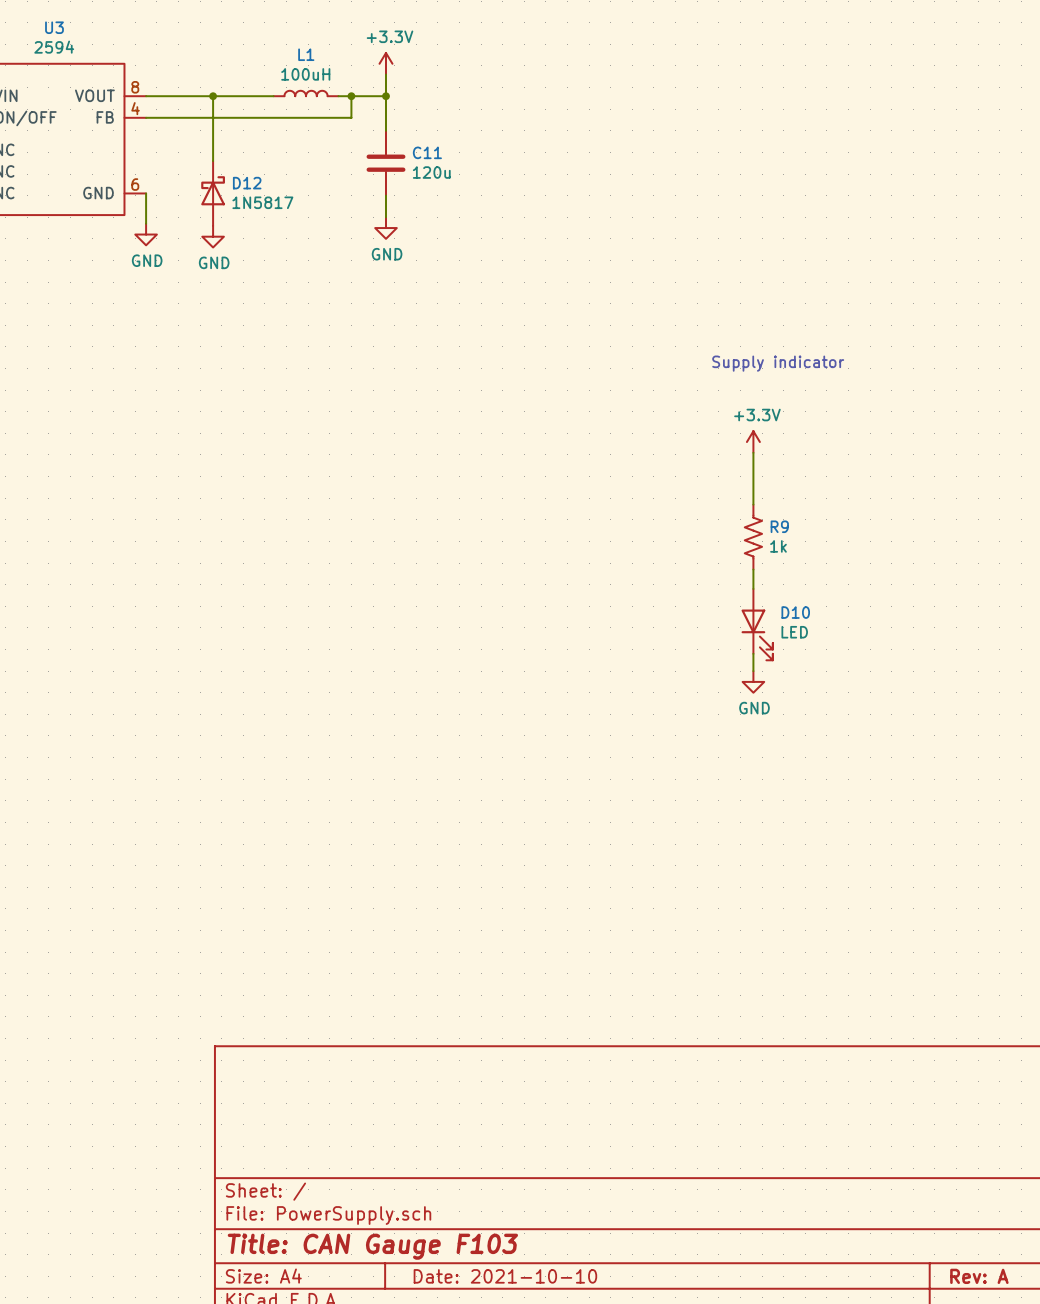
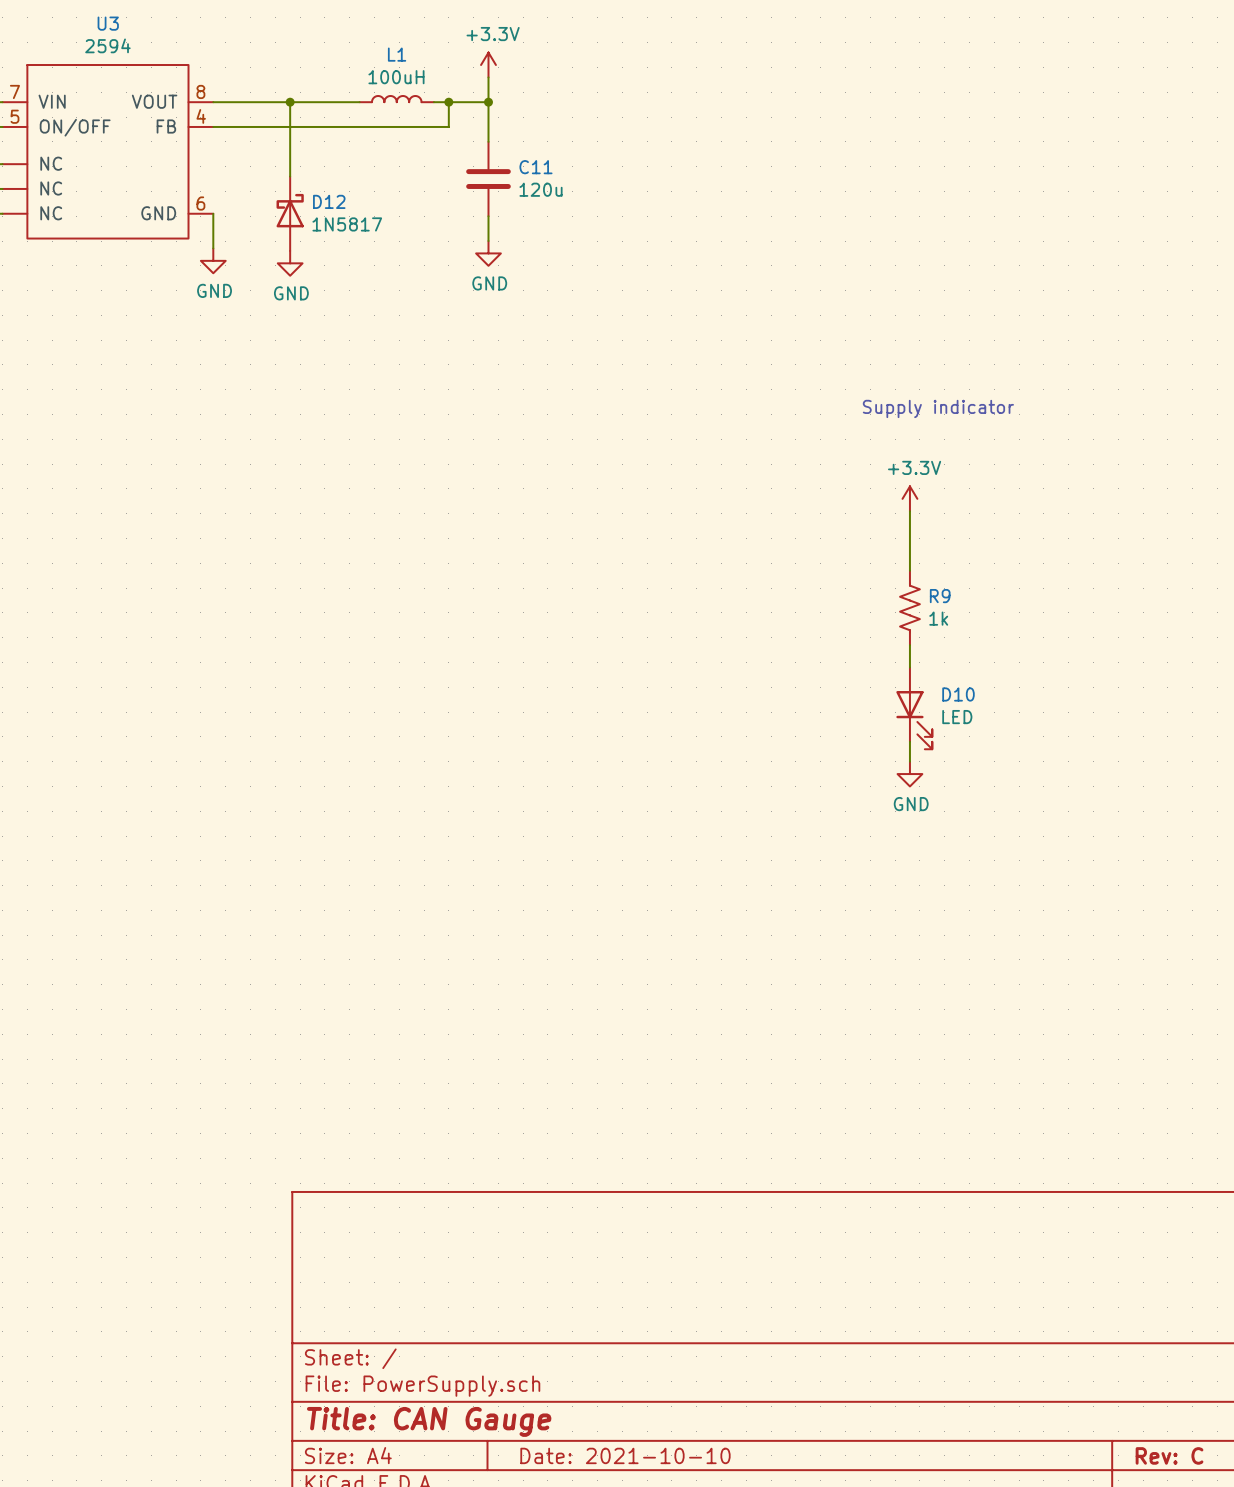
title block: Title: CAN Gauge F103 (372, 1246) -> Title: CAN Gauge (429, 1421)
title block: Rev: A (979, 1276) -> Rev: C (1169, 1455)

